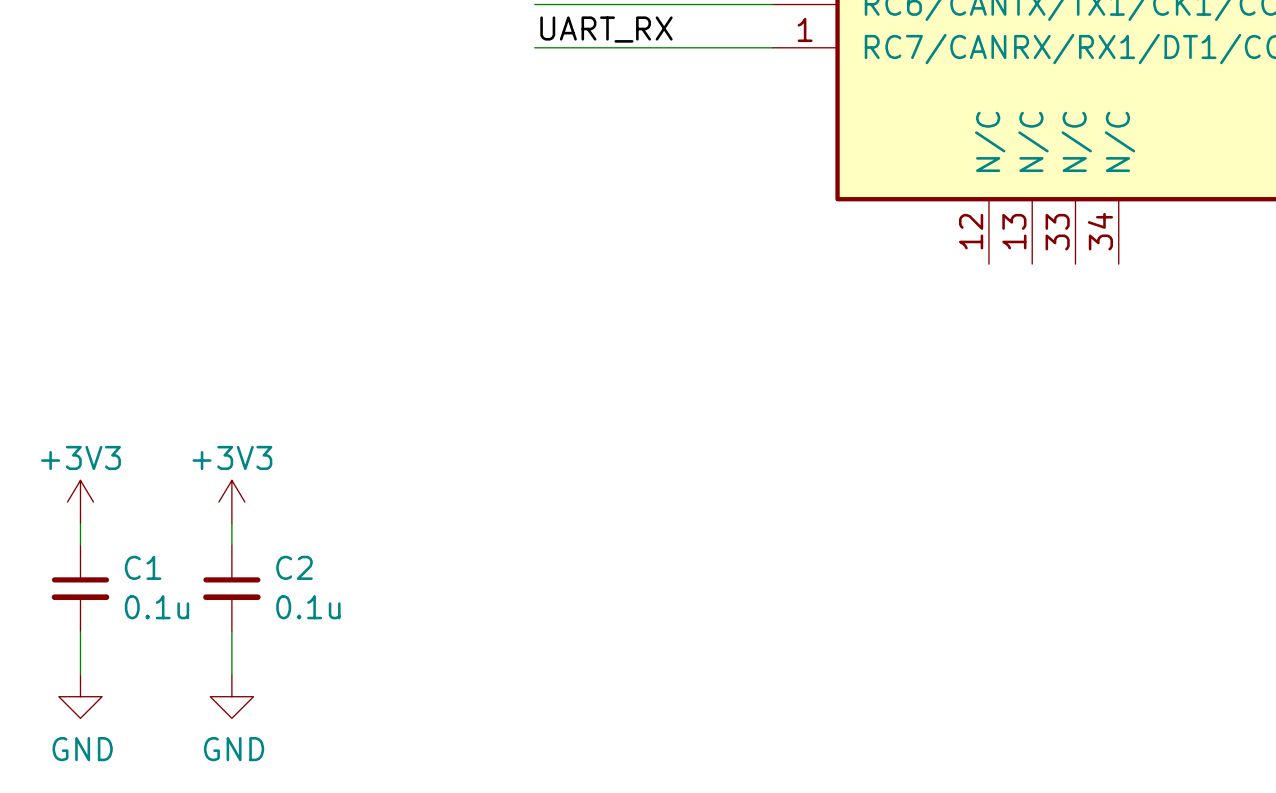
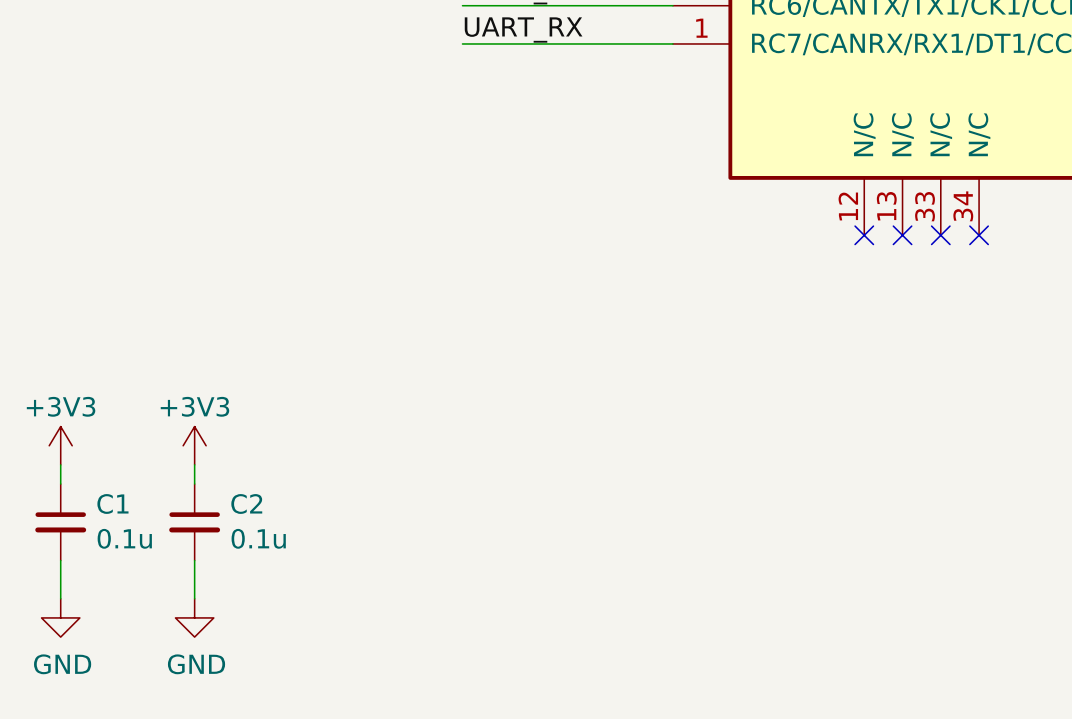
no-connect mark: none -> (864, 235)
no-connect mark: none -> (902, 235)
no-connect mark: none -> (940, 235)
no-connect mark: none -> (979, 235)

